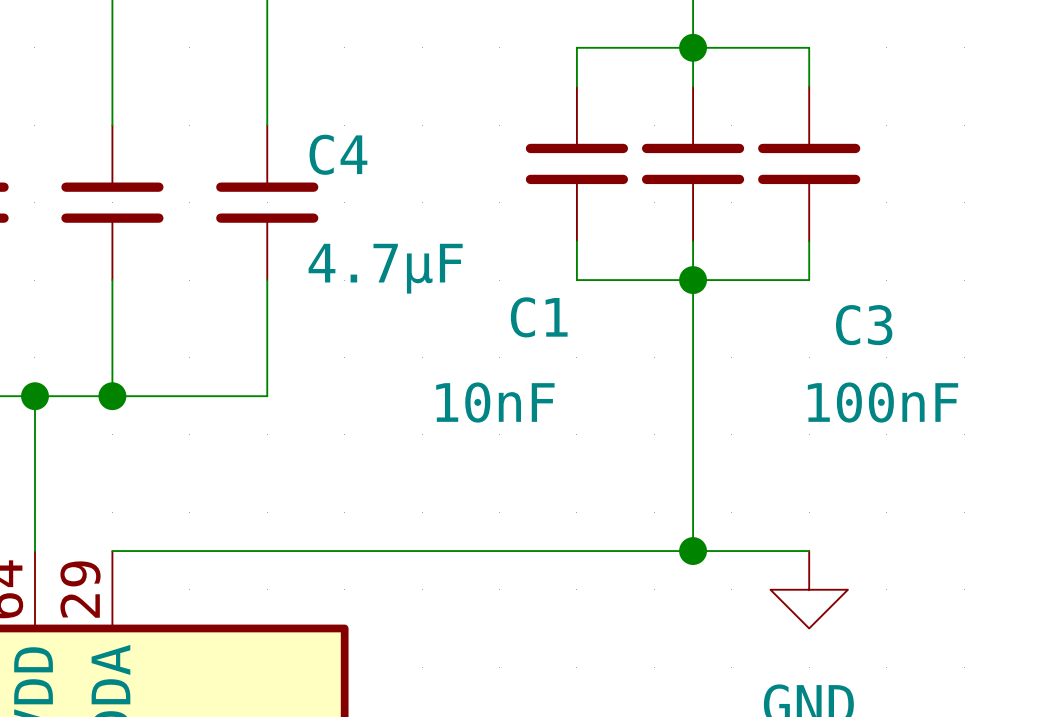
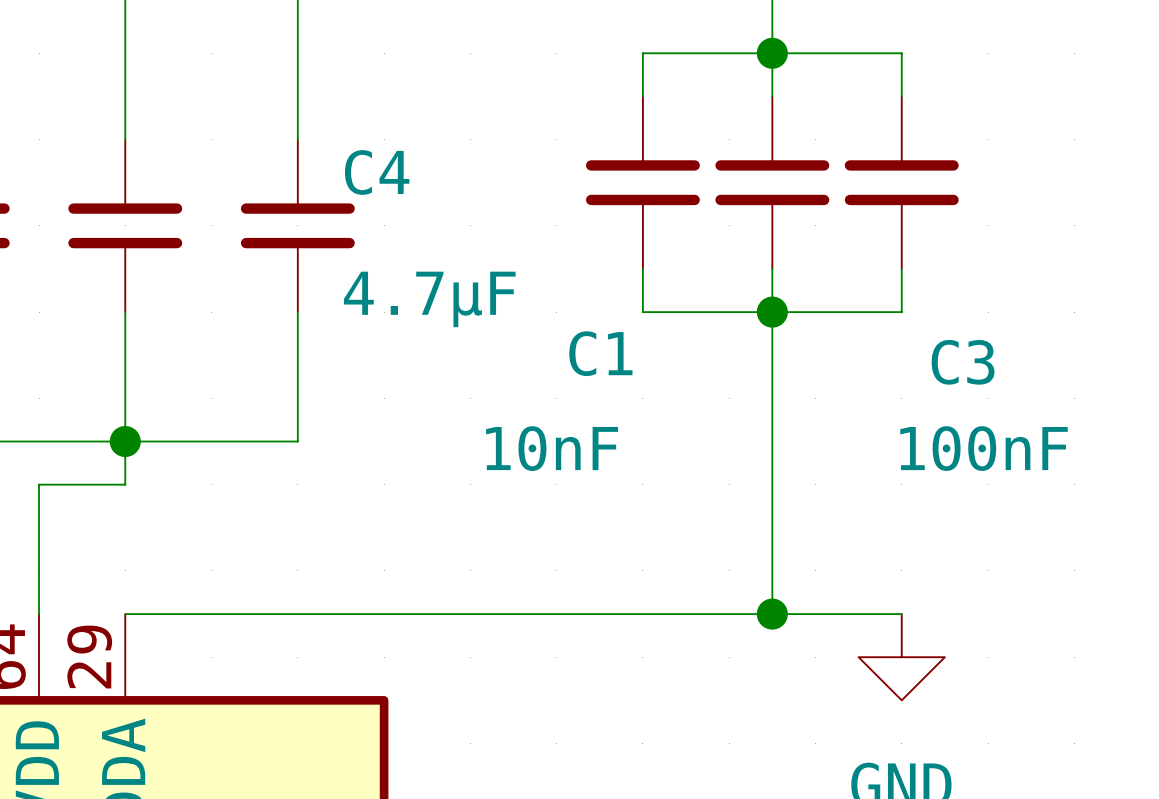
wire: (34, 396) (34, 434) -> (125, 441) (125, 484) (39, 484)
junction: (34, 396) -> none

